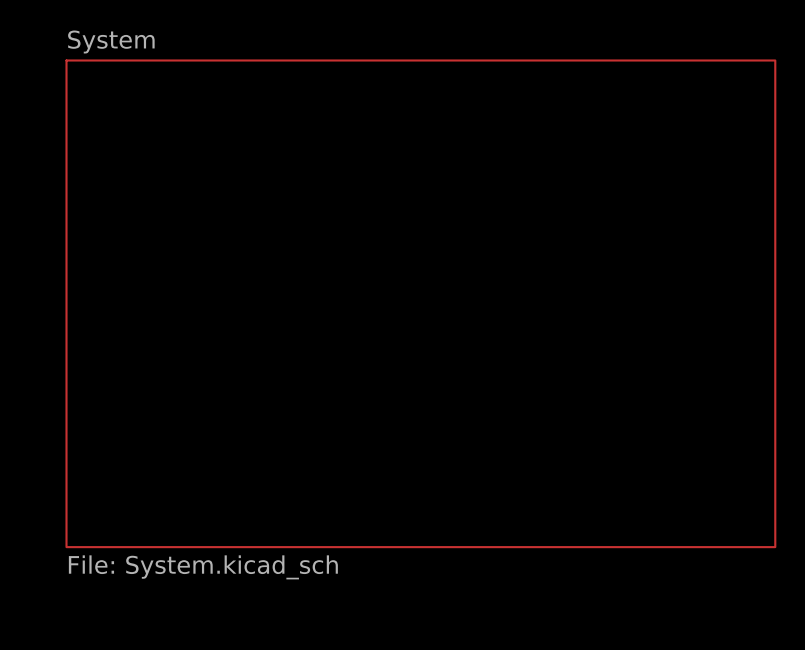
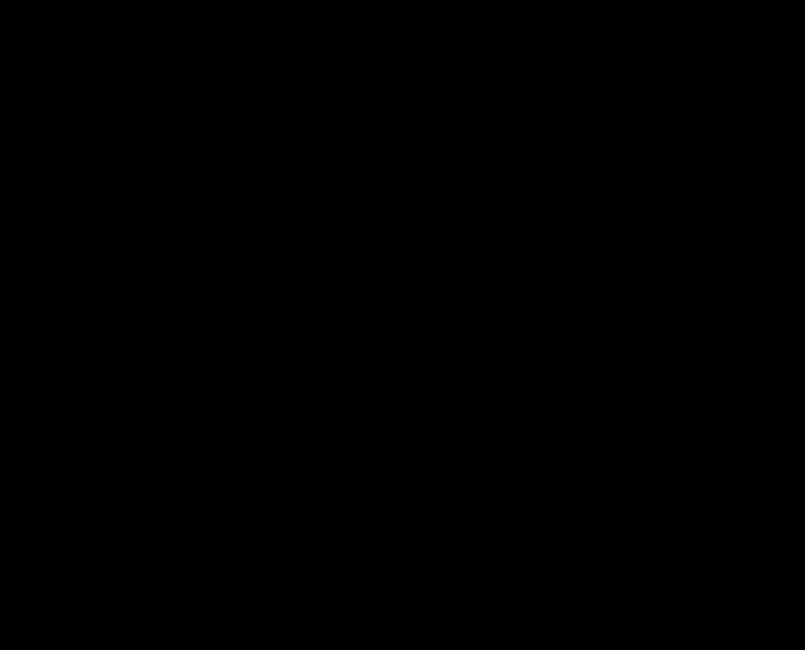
sheet System: File: System.kicad_sch (420, 303) -> none

